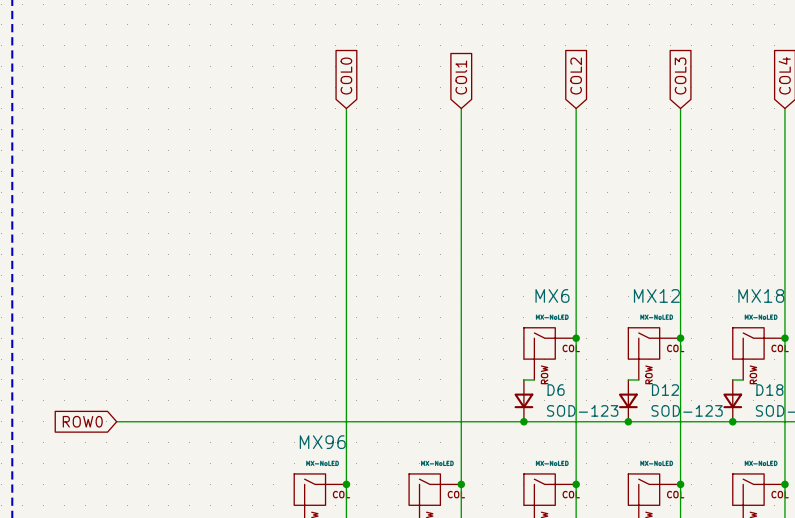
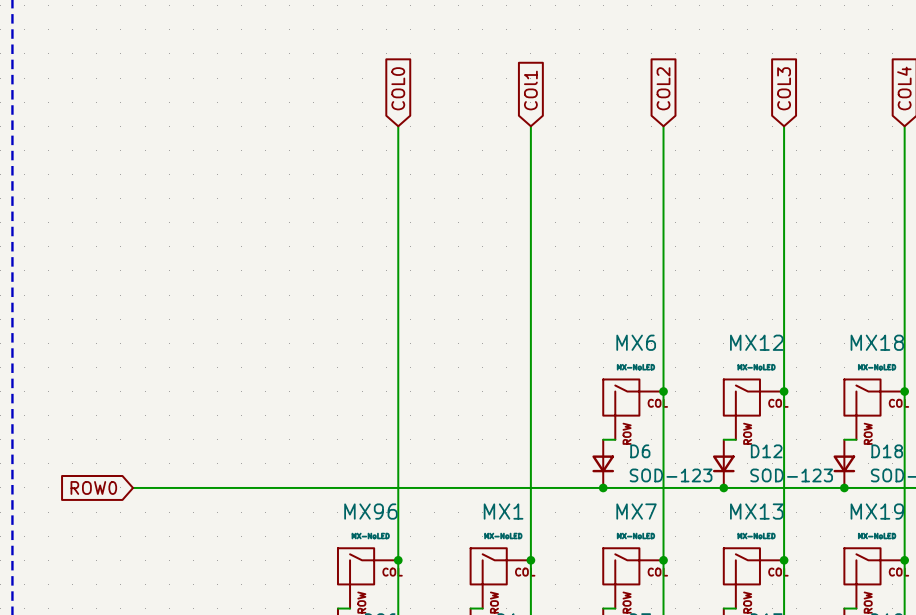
MX1 name: none -> MX1 (503, 511)
MX7 name: none -> MX7 (636, 511)
MX13 name: none -> MX13 (756, 511)
MX19 name: none -> MX19 (877, 511)

